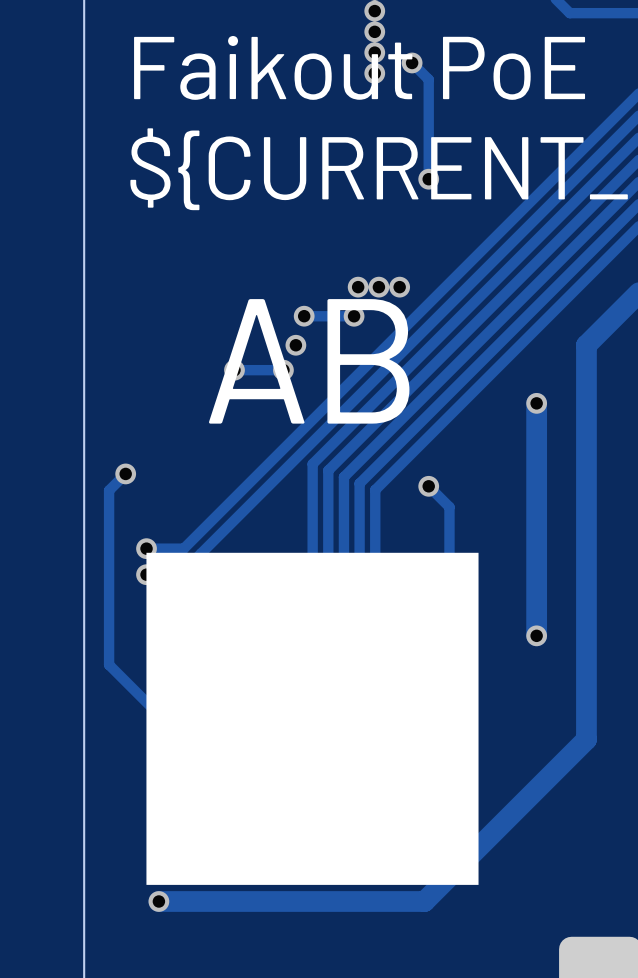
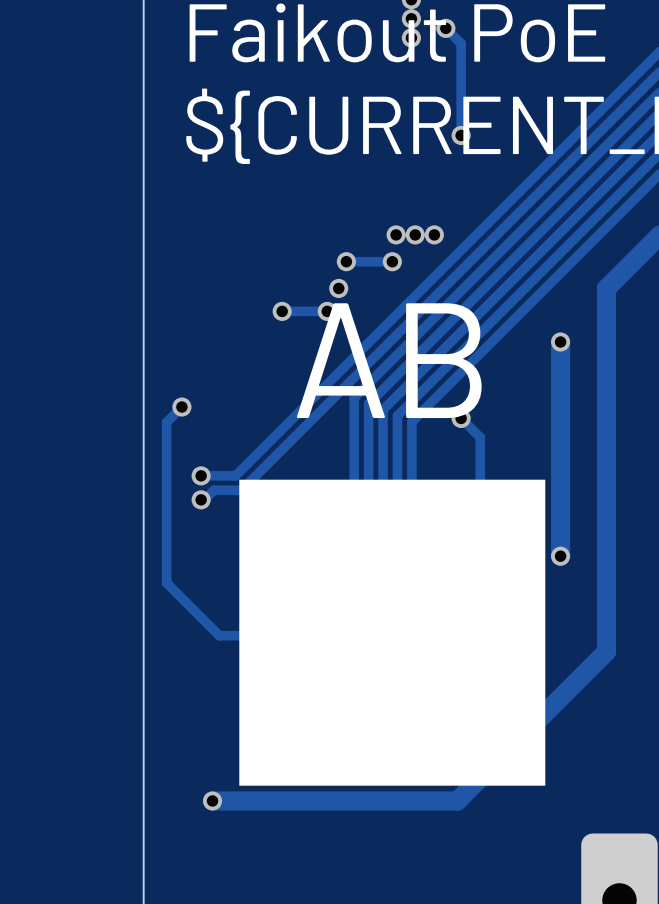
text position: AB (309, 361) -> AB (389, 360)
drawing position: (312, 718) -> (392, 632)

